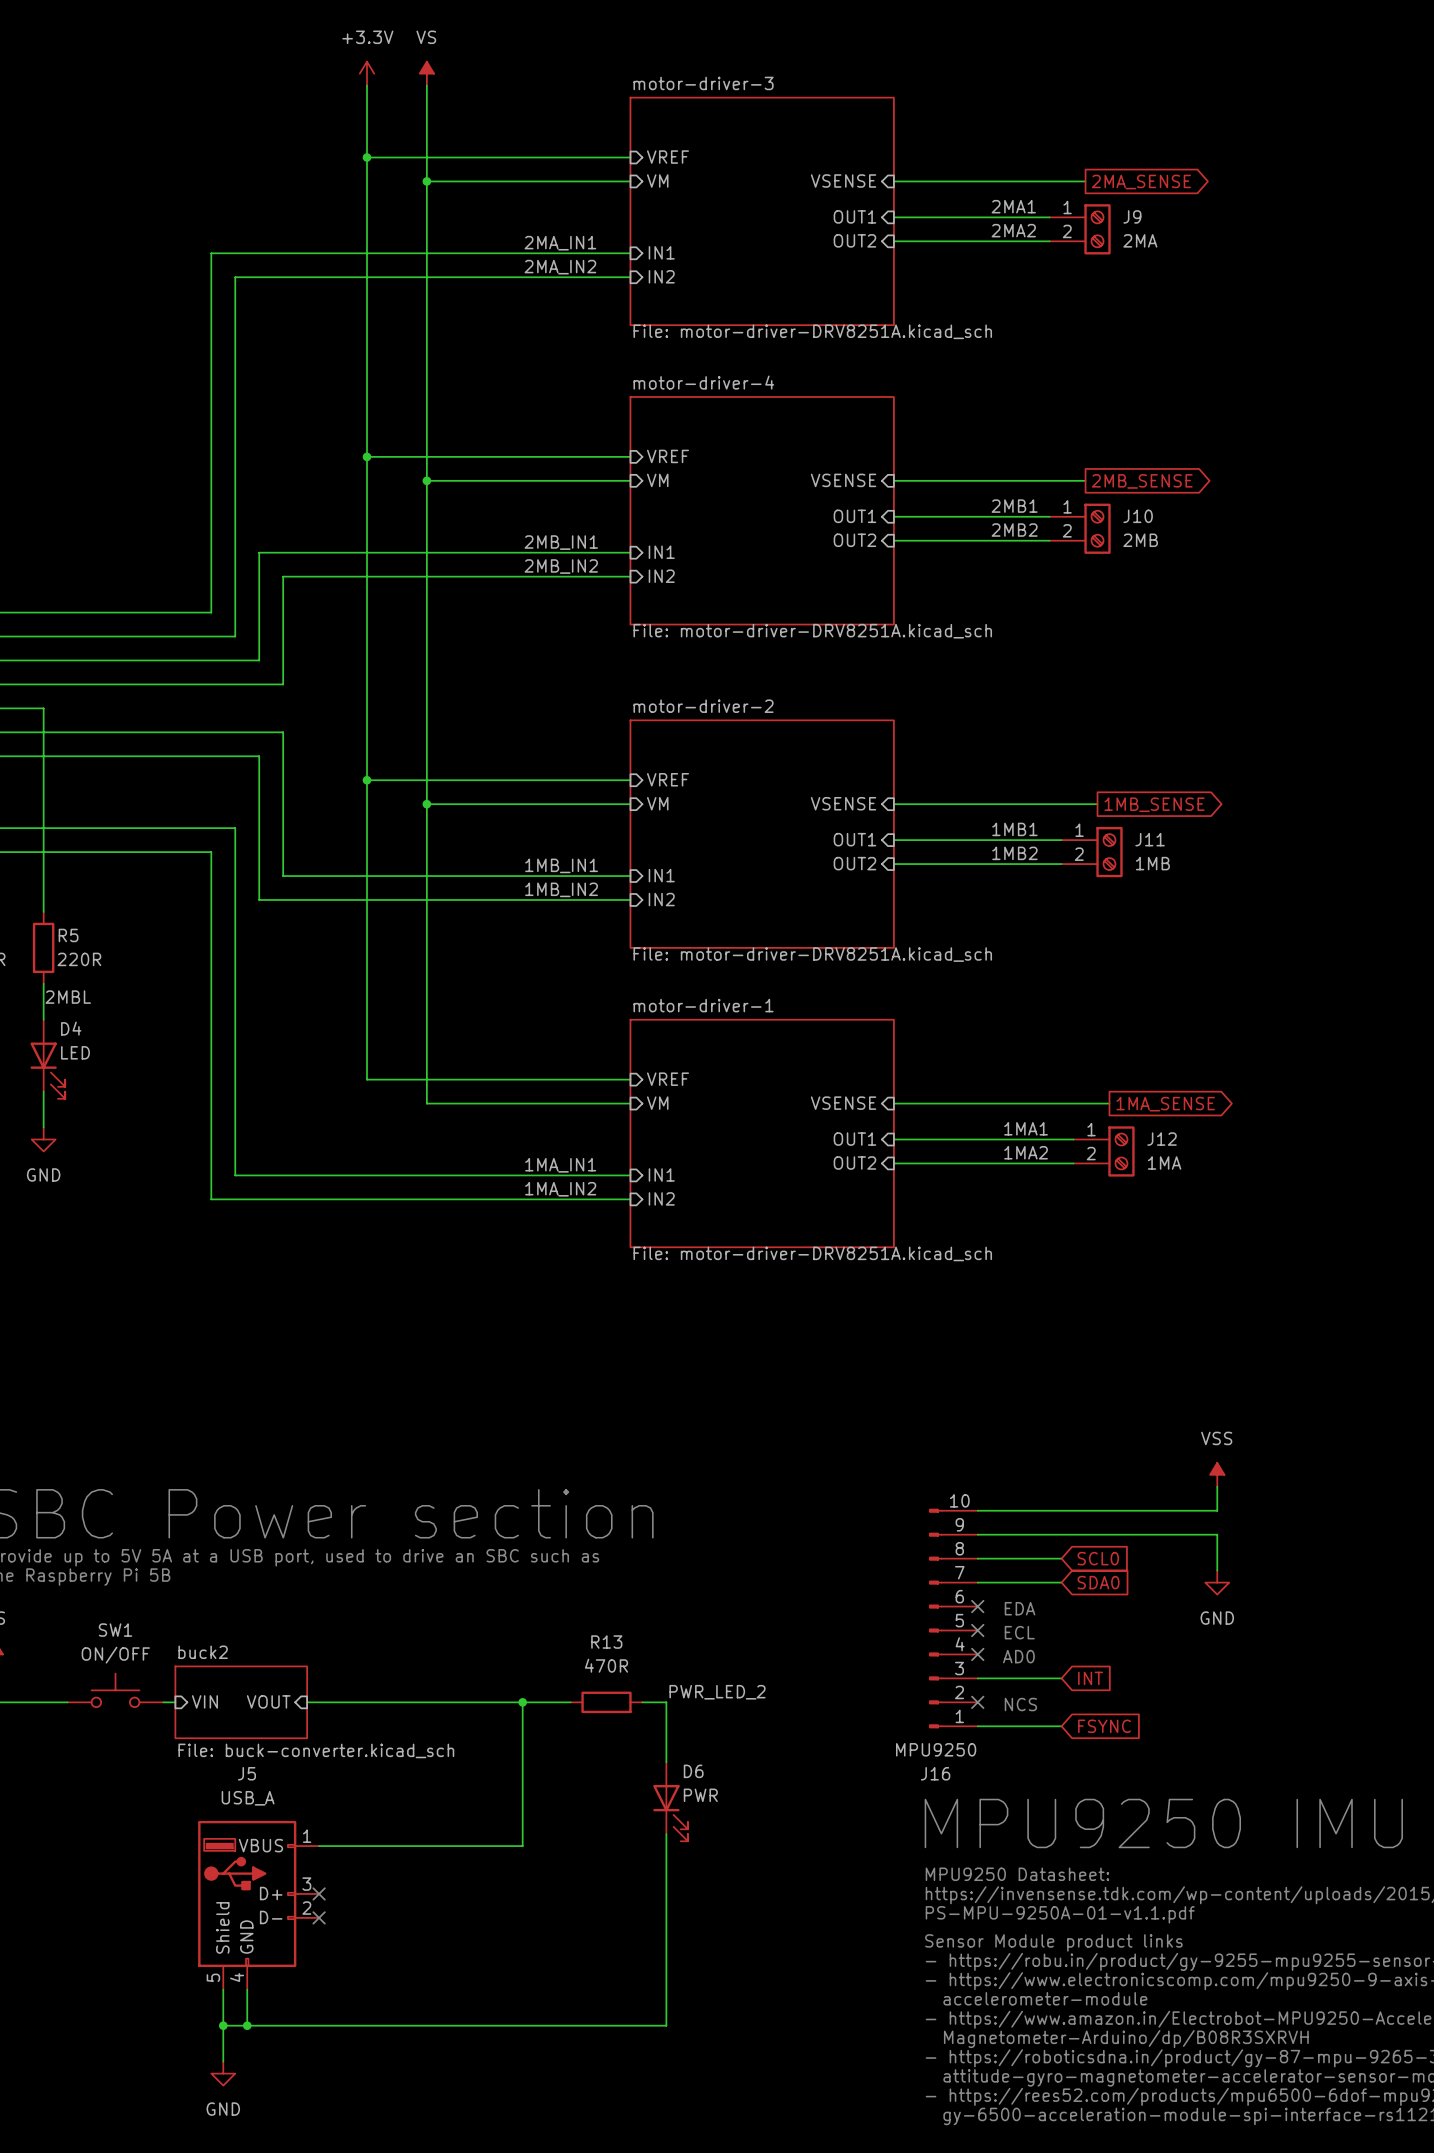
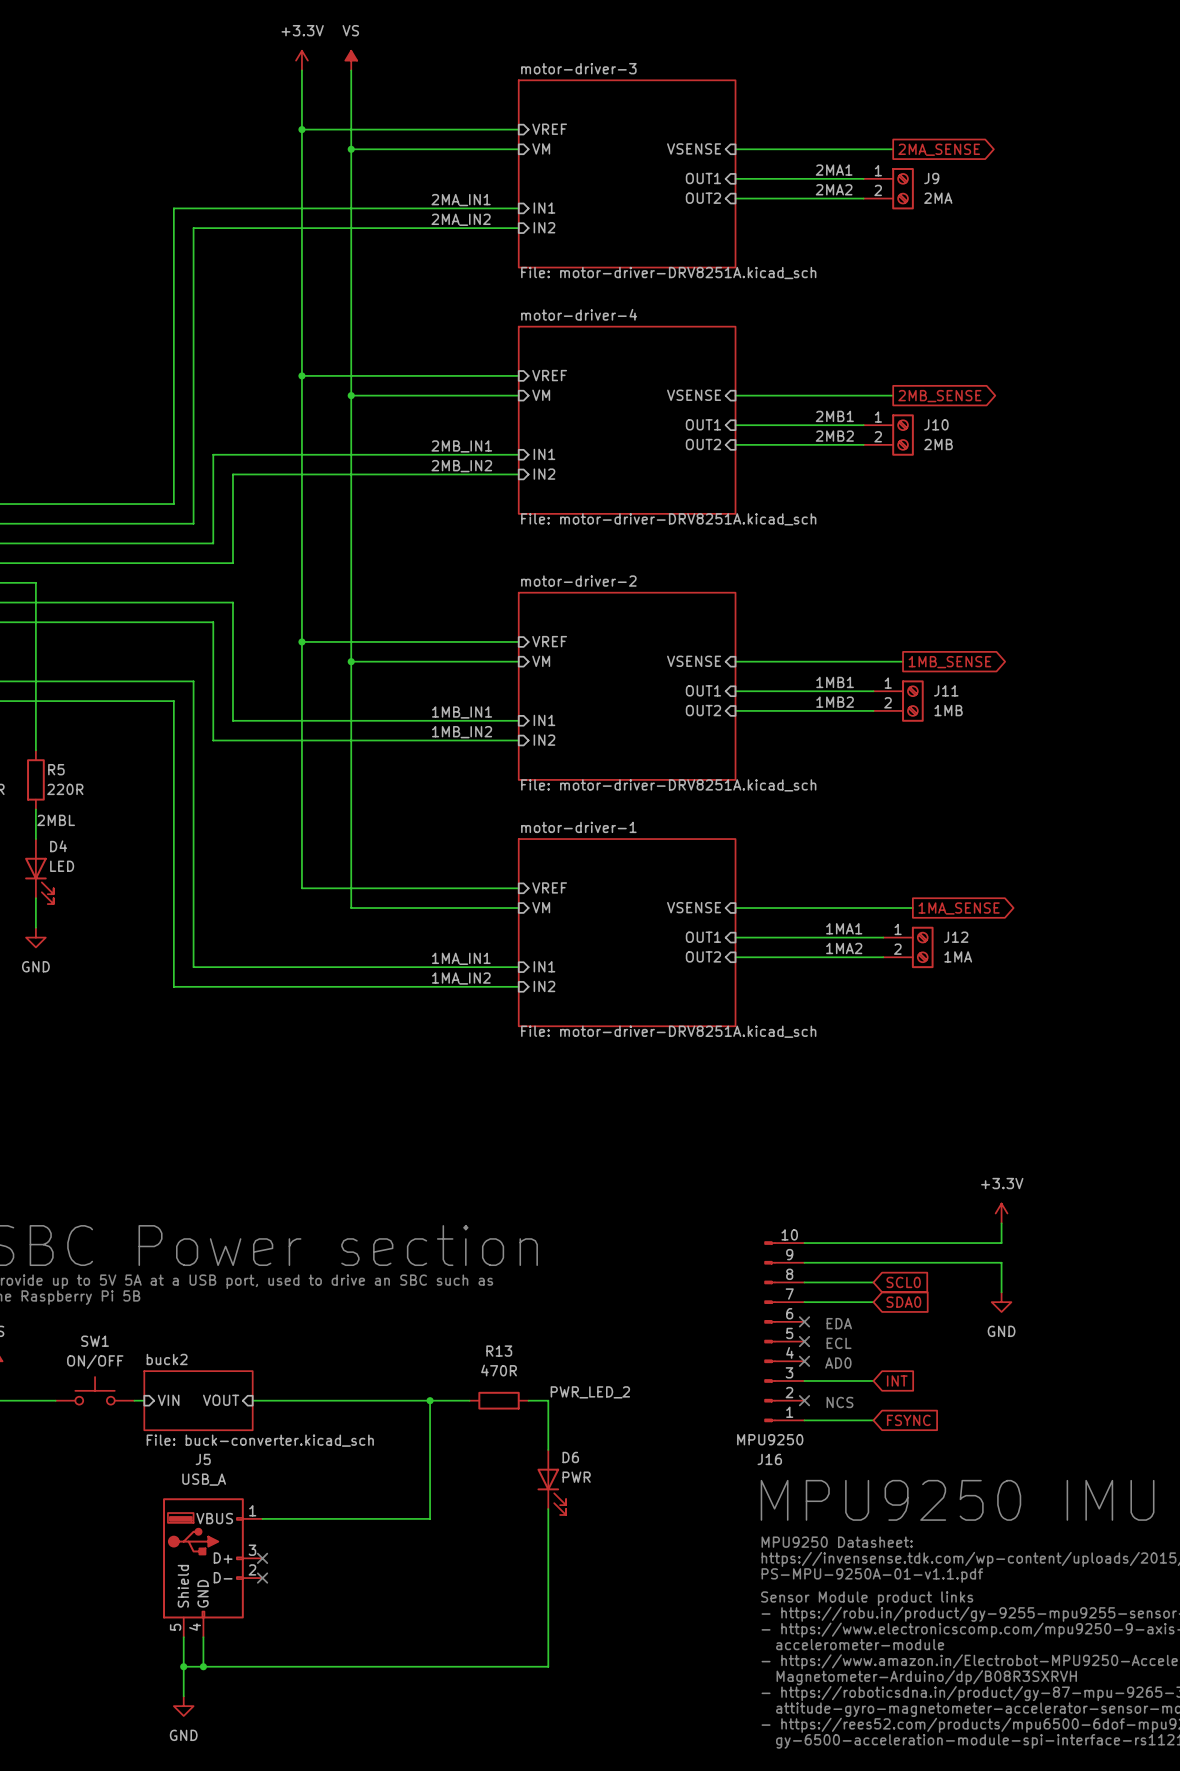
power symbol: VSS (1217, 1474) -> +3.3V (1001, 1213)

